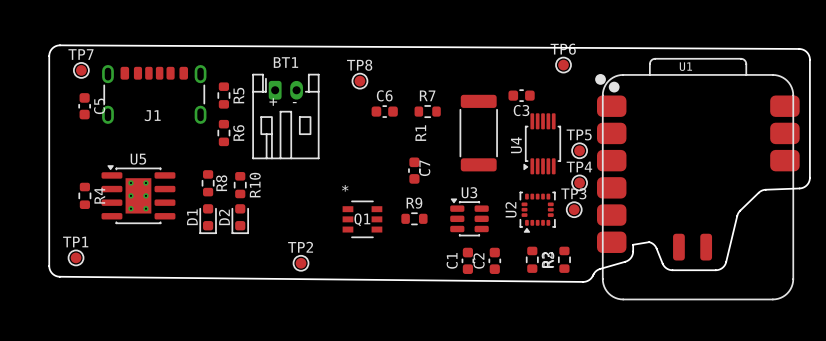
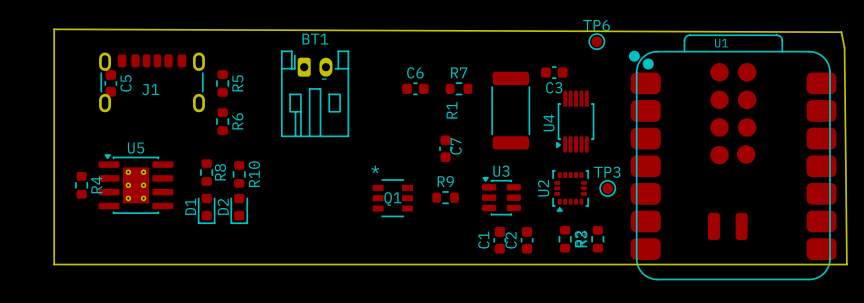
board edge: (60, 45) (800, 49) (806, 52) (809, 58) (809, 179) (807, 184) (802, 188) (762, 190) (740, 210) (725, 263) (722, 267) (716, 270) (668, 269) (663, 264) (655, 246) (649, 242) (633, 244) (632, 254) (629, 259) (598, 269) (590, 278) (584, 281) (58, 276) (52, 273) (49, 266) (49, 56) (52, 48) (60, 45) -> (54, 29) (54, 264) (846, 264) (844, 47) (841, 32) (54, 29)
U1 footprint: [595, 58, 800, 301] -> [628, 34, 837, 281]
TP7: (81, 70) -> none
TP8: (359, 81) -> none
J1 position: (154, 94) -> (152, 82)
R5 position: (223, 95) -> (222, 83)
text: + (273, 102) -> none
J1 name position: J1 (152, 115) -> J1 (150, 89)
R6 position: (223, 133) -> (222, 121)
TP5: (579, 150) -> none
TP4: (579, 182) -> none
R8 position: (208, 183) -> (206, 172)
R10 position: (240, 185) -> (239, 174)
U5 position: (138, 194) -> (135, 184)
R4 position: (84, 195) -> (81, 185)
D1 position: (208, 219) -> (206, 208)
D2 position: (240, 219) -> (239, 208)
TP1: (76, 257) -> none
TP2: (301, 263) -> none

